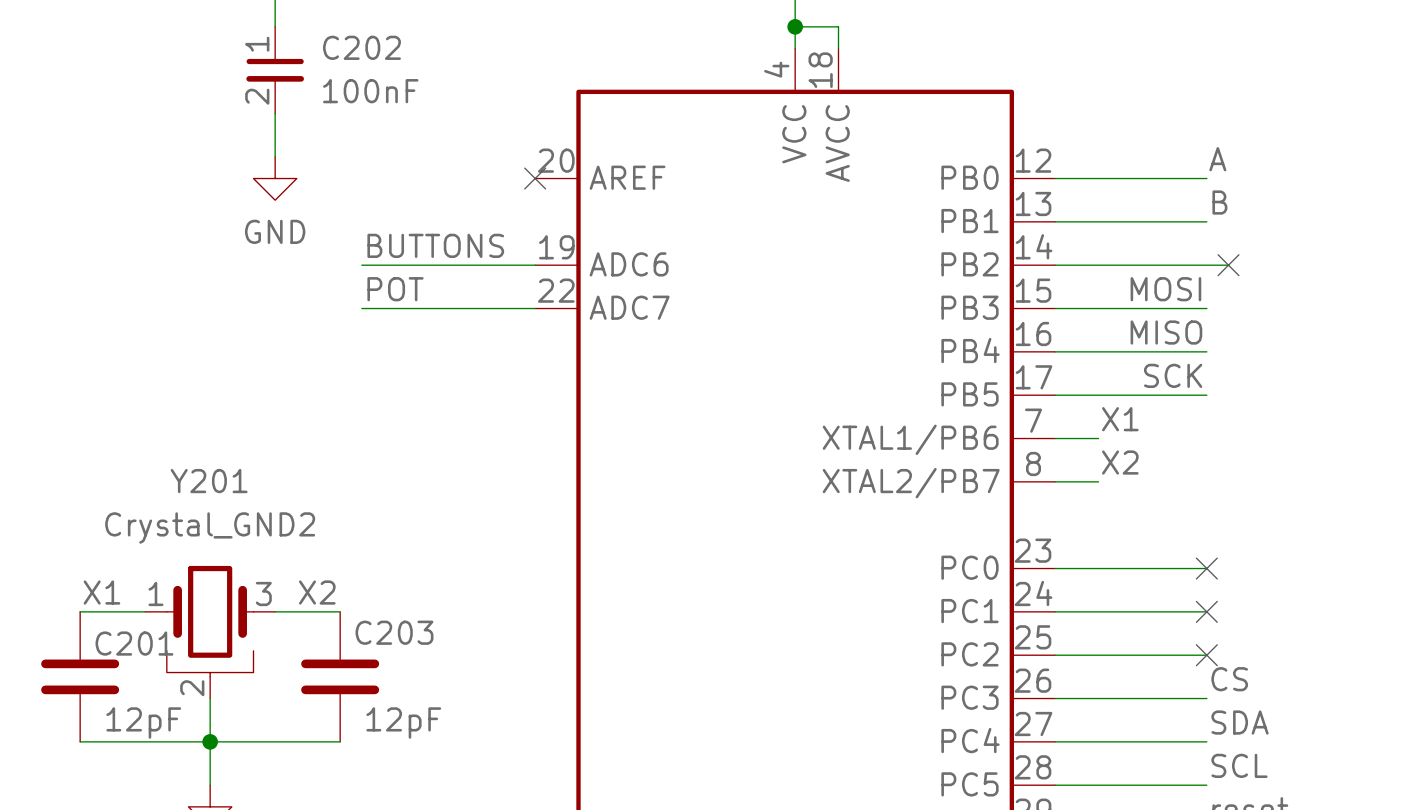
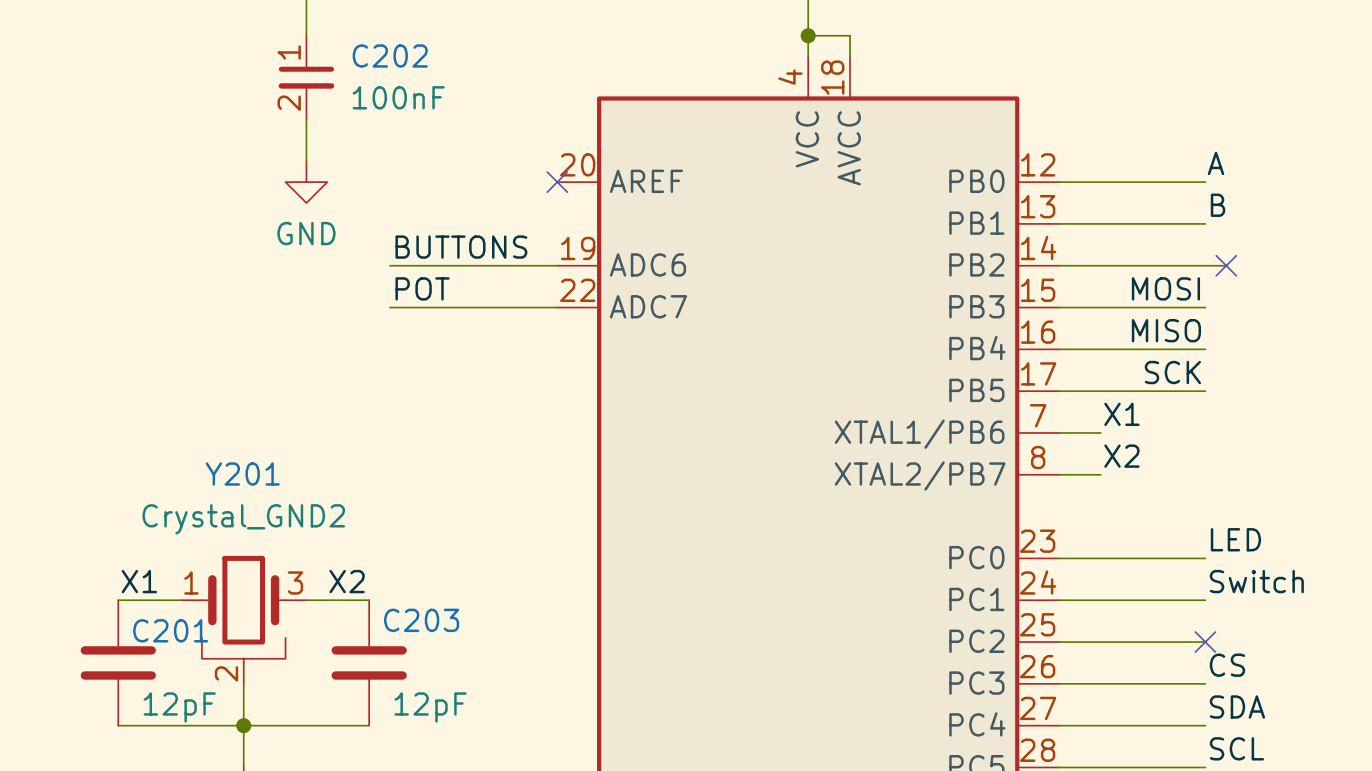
label: none -> LED (1235, 539)
no-connect mark: (1206, 568) -> none
label: none -> Switch (1256, 581)
no-connect mark: (1206, 611) -> none

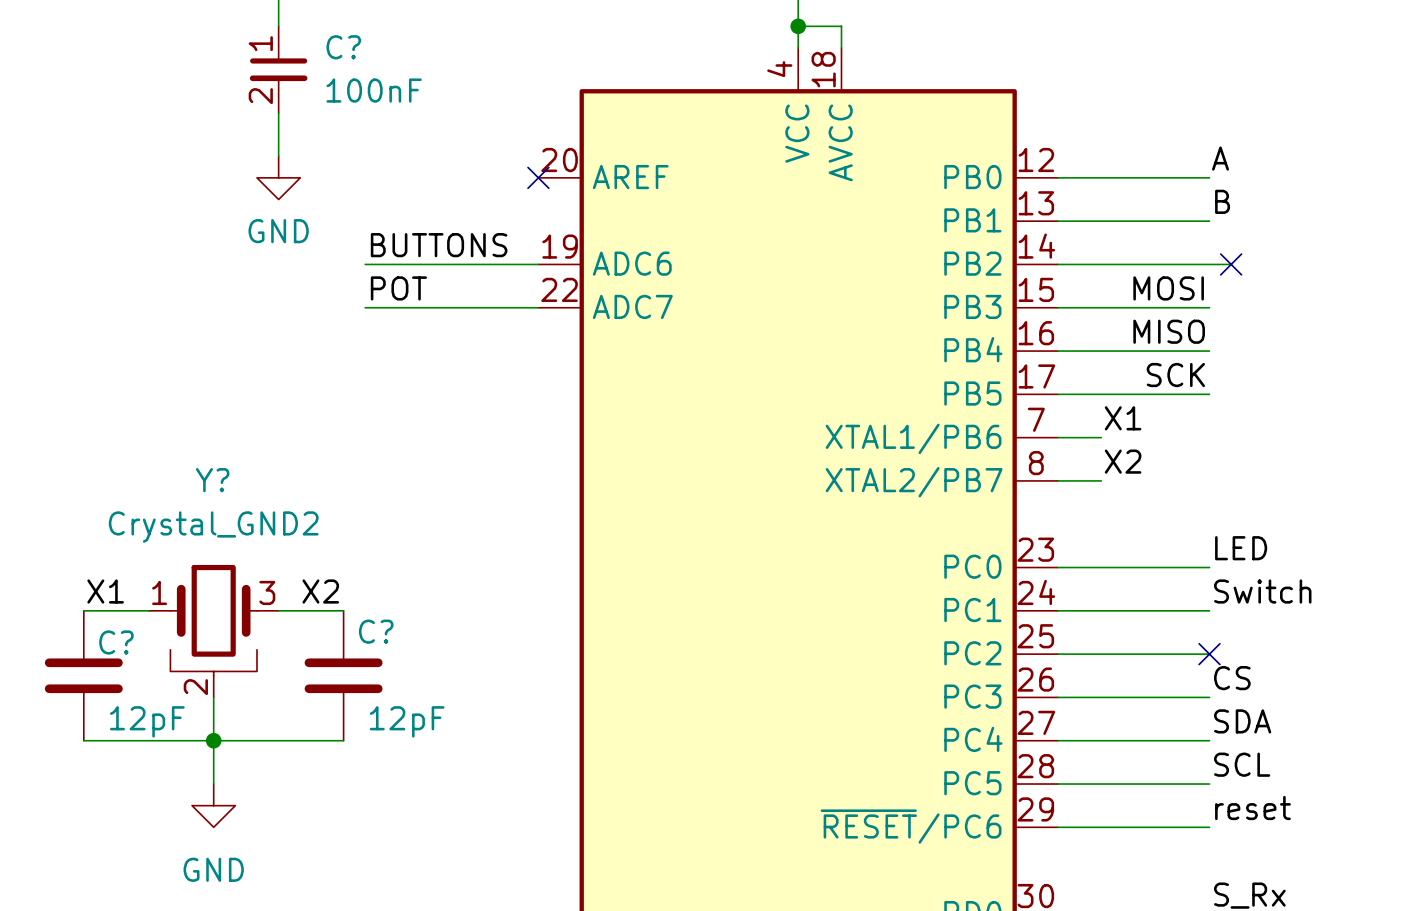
C202 name: C202 (390, 55) -> C? (343, 47)
Y201 name: Y201 (242, 474) -> Y? (212, 480)
C203 name: C203 (421, 620) -> C? (376, 631)
C201 name: C201 (170, 630) -> C? (116, 642)

